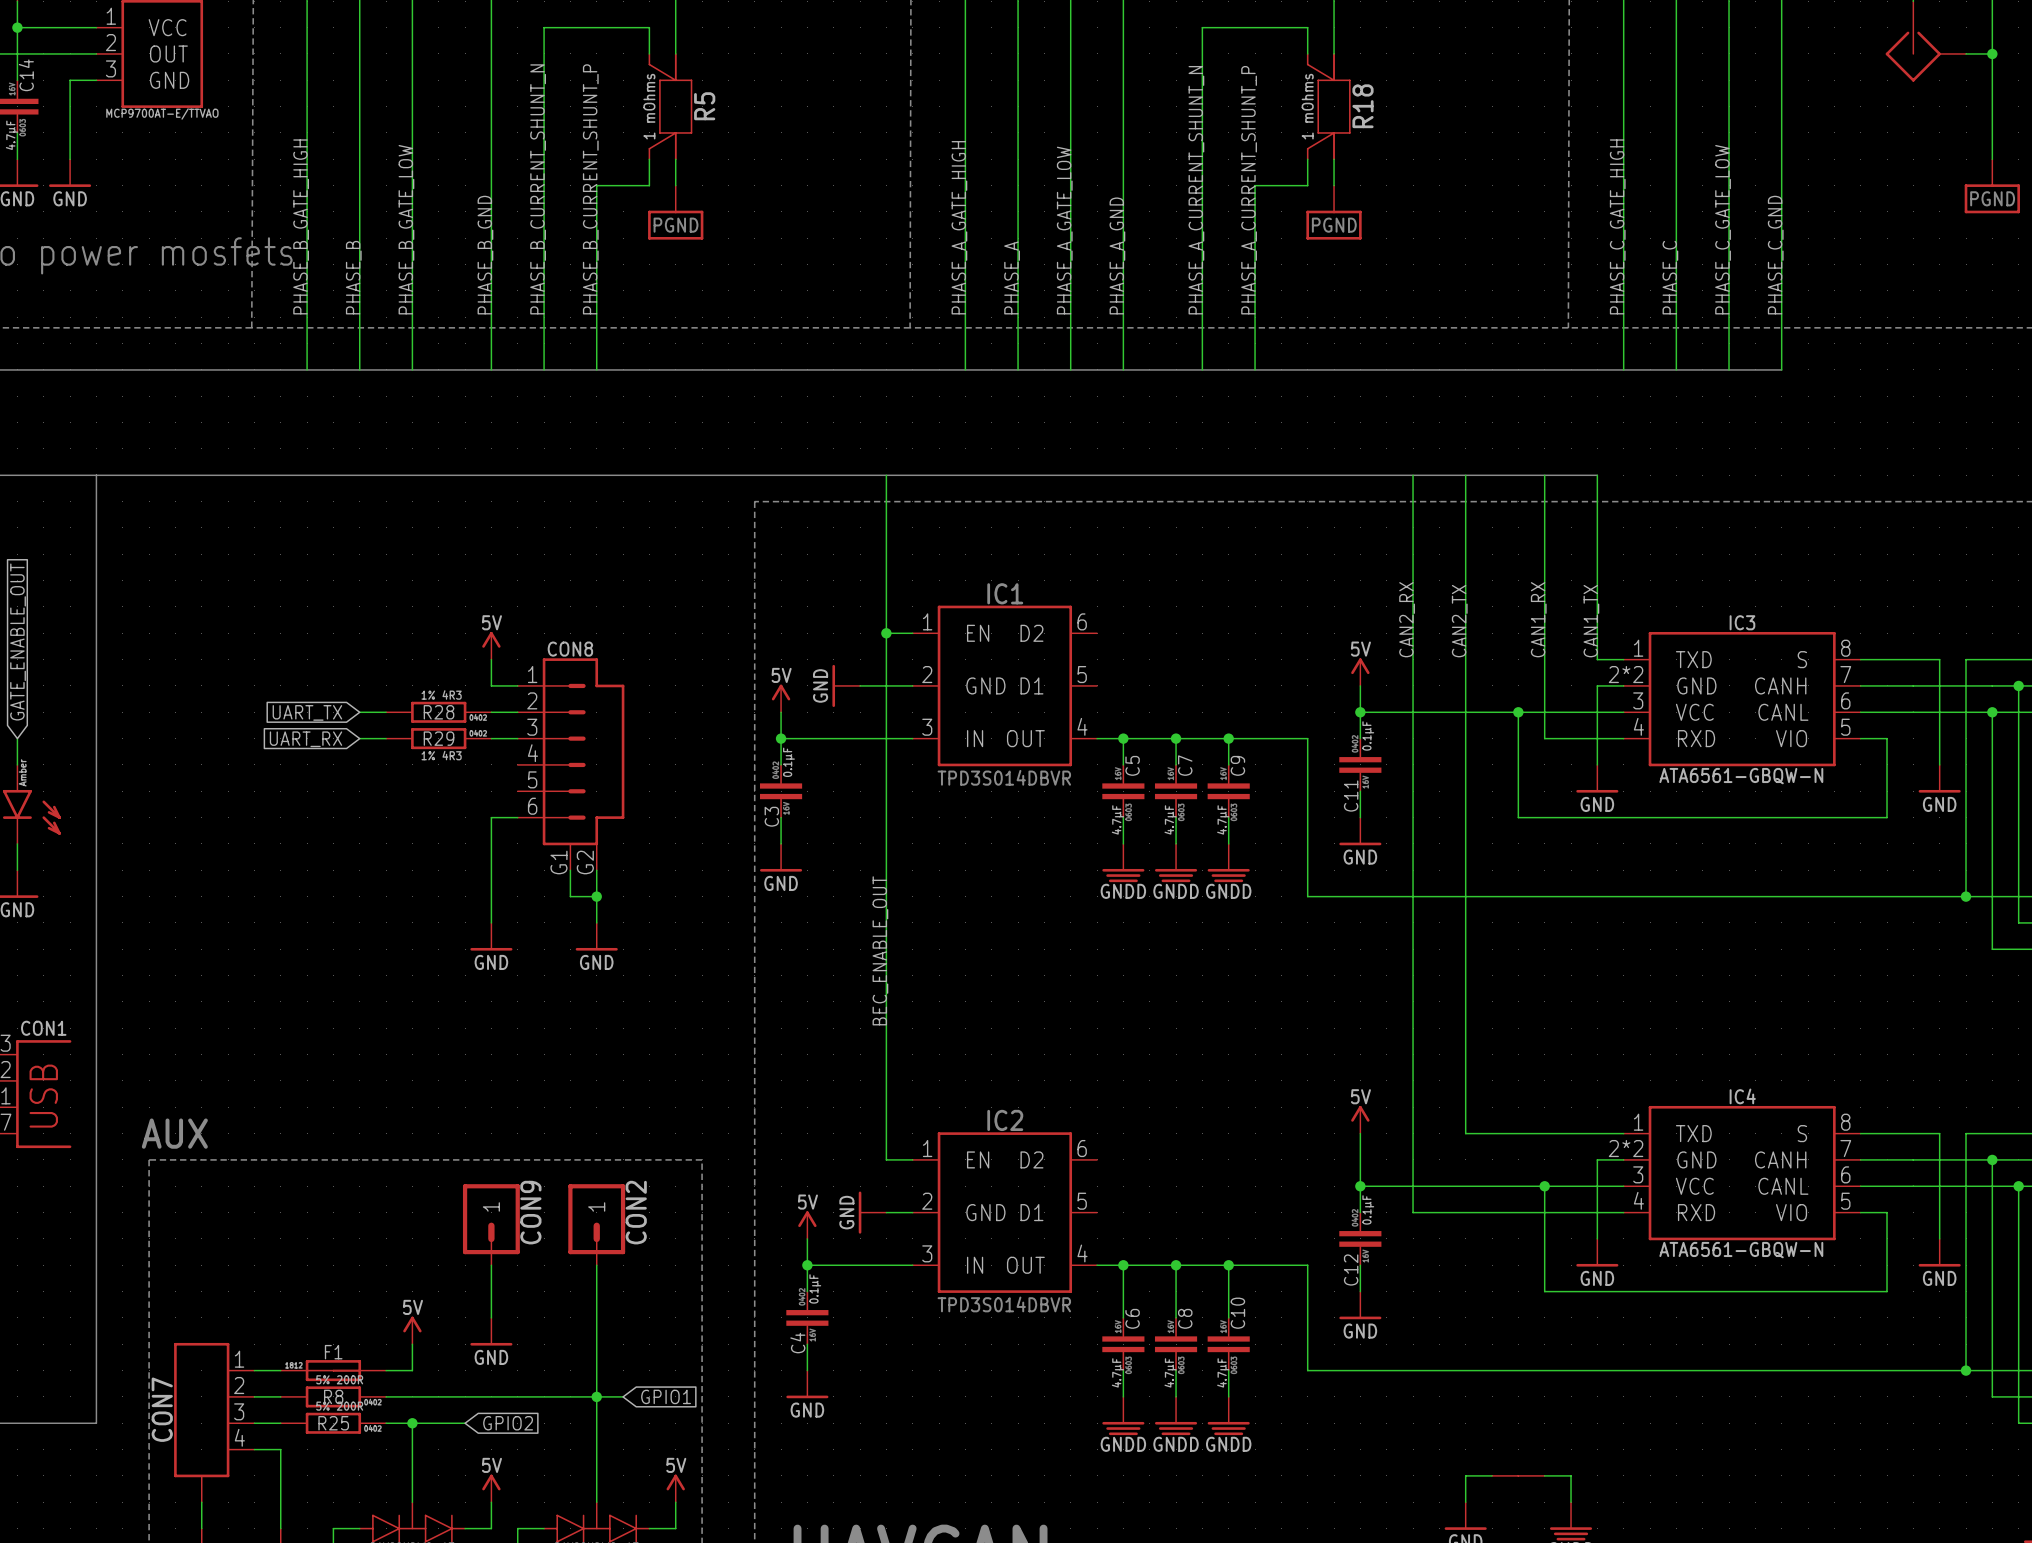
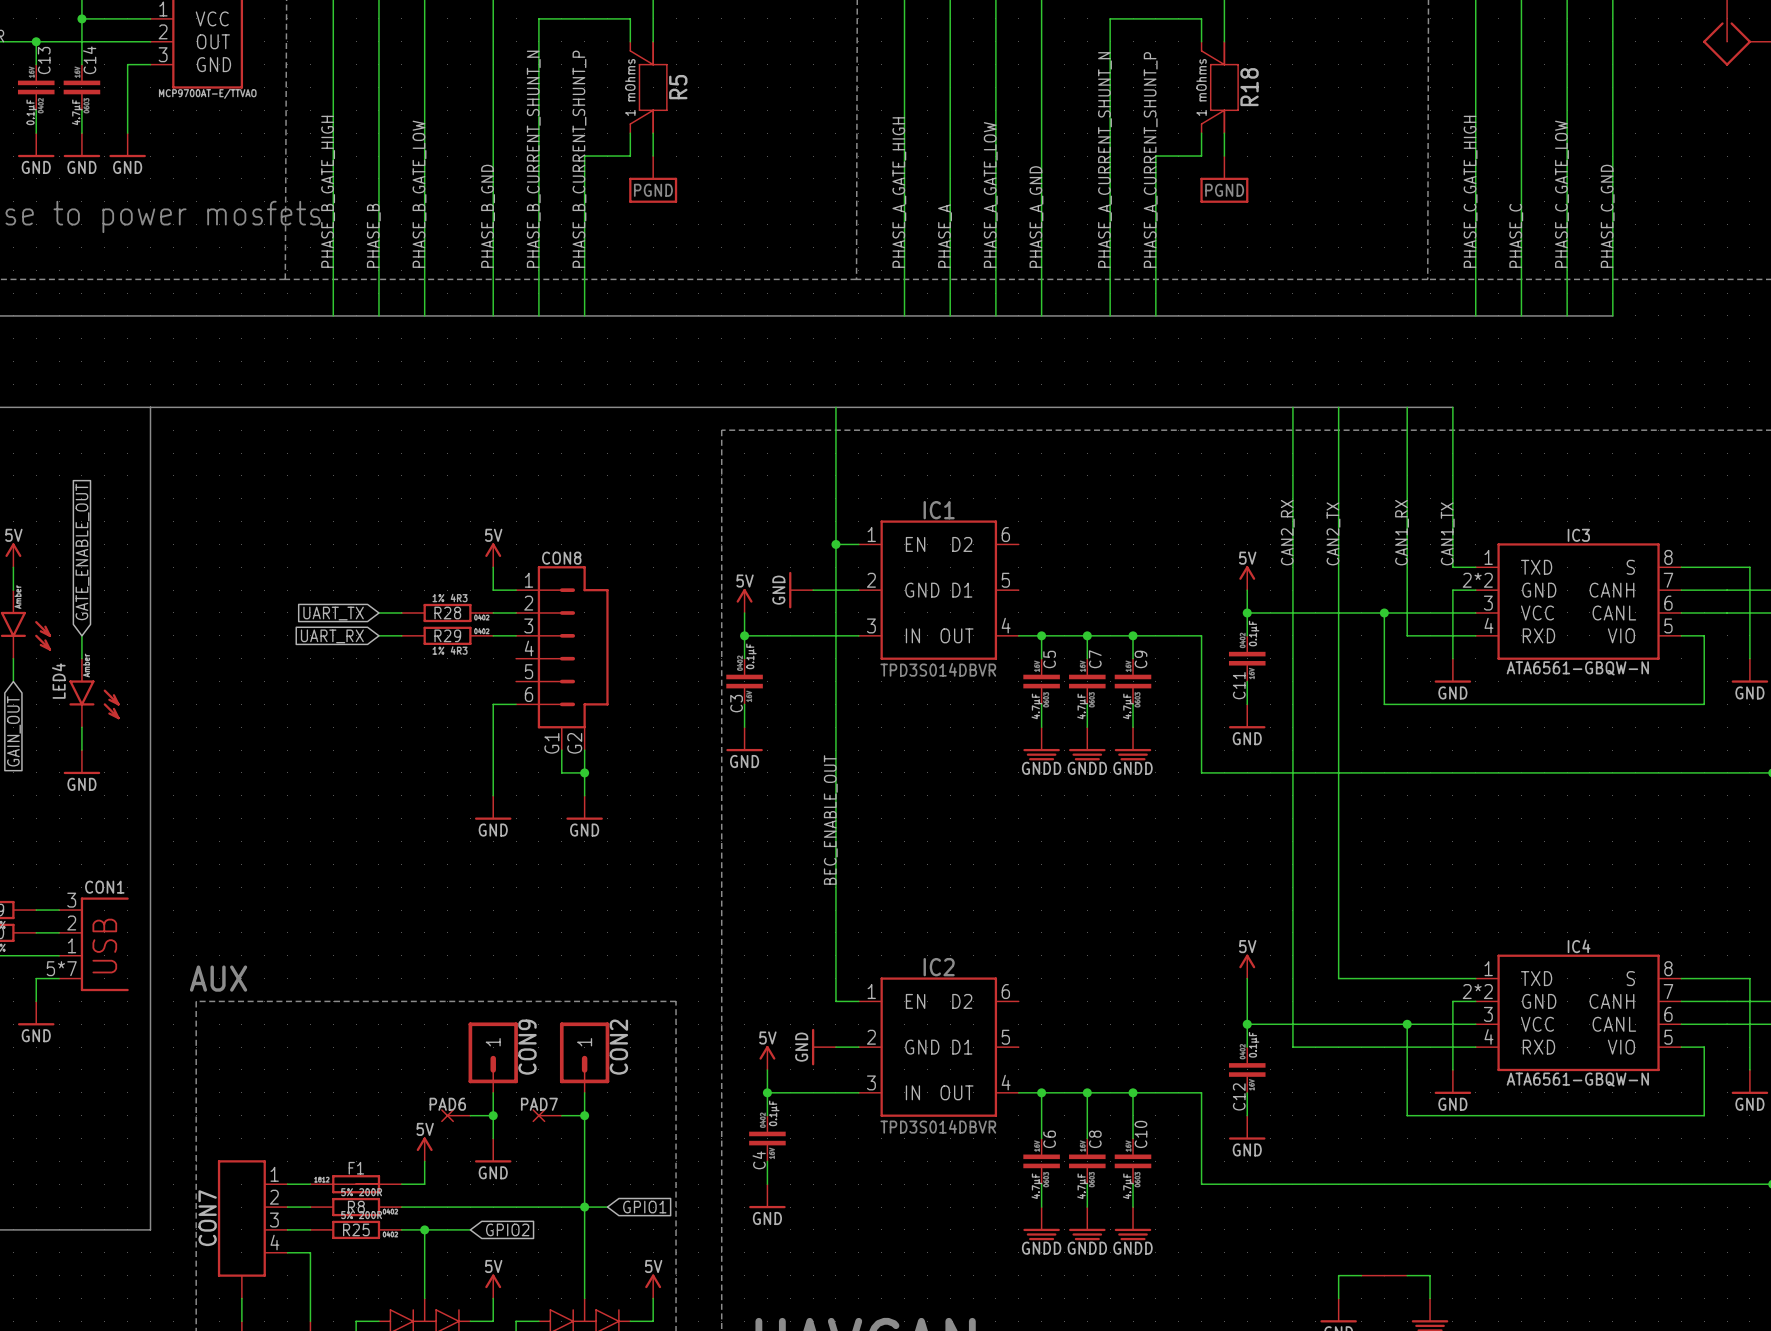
PAD6: none -> (455, 1115)
wire: none -> (470, 1115) (493, 1115)
junction: none -> (493, 1115)
PAD7: none -> (547, 1115)
wire: none -> (561, 1115) (584, 1115)
junction: none -> (584, 1115)

